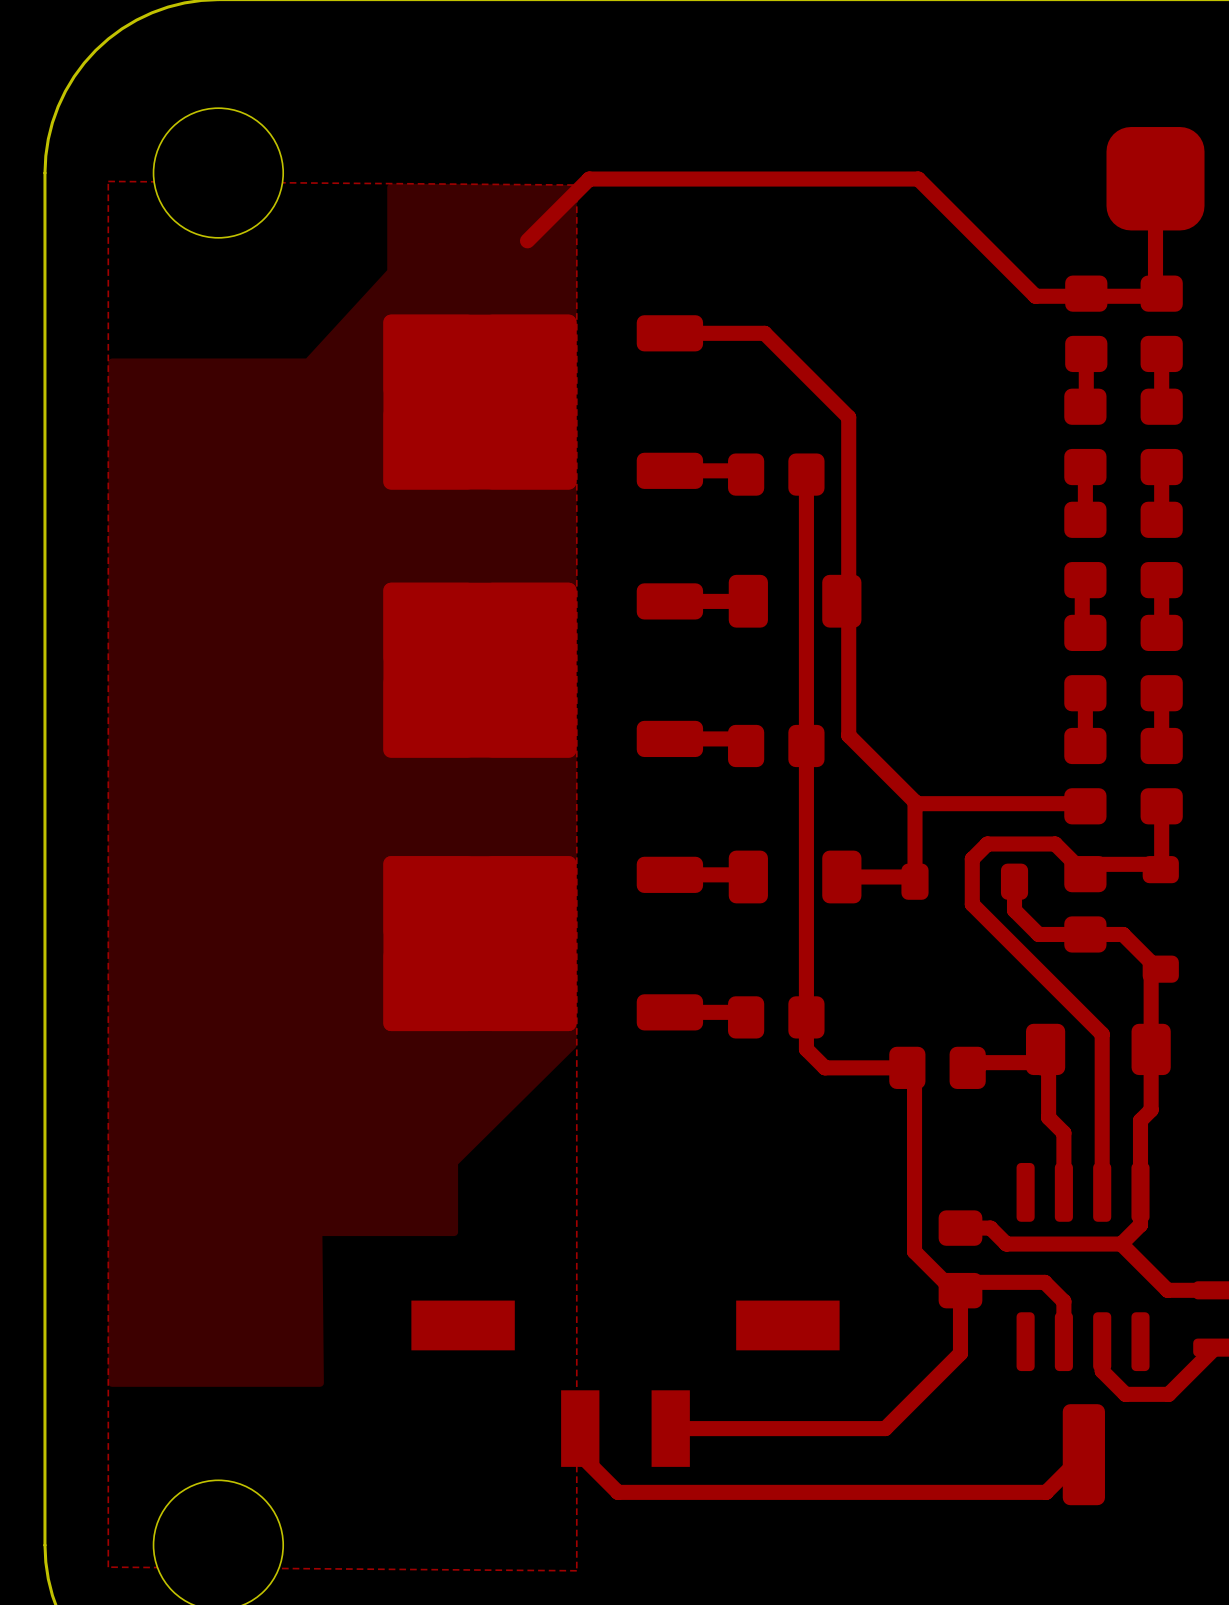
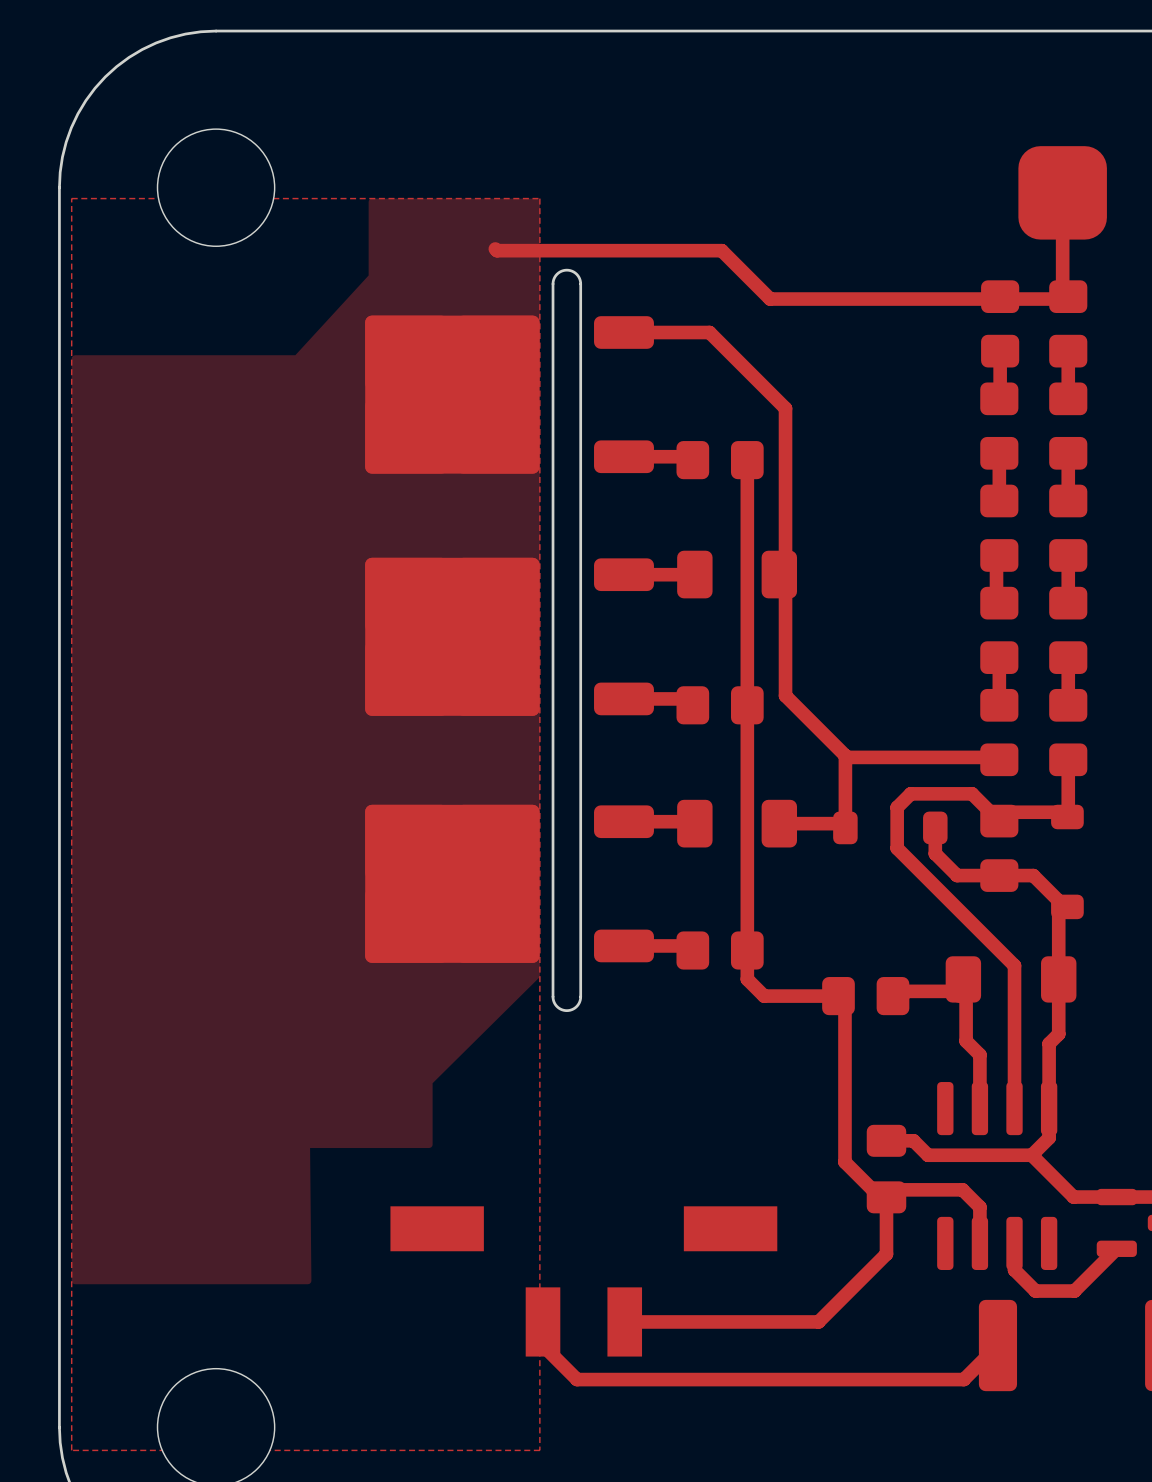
top zone outline: (576, 185) (108, 181) (108, 1567) (576, 1570) -> (539, 198) (71, 198) (71, 1450) (539, 1450)
top track: (527, 240) (589, 179) (918, 179) (1035, 296) -> (495, 248) (497, 250) (721, 250) (770, 299) (954, 299)
board edge: none -> (580, 283) (580, 996) (576, 1007) (566, 1010) (557, 1007) (553, 996) (553, 283) (557, 274) (566, 270) (576, 274) (580, 283)

